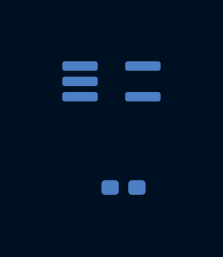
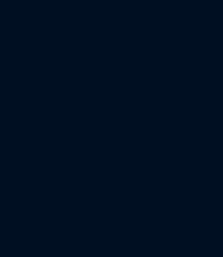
part: (111, 81) -> none
part: (123, 187) -> none

